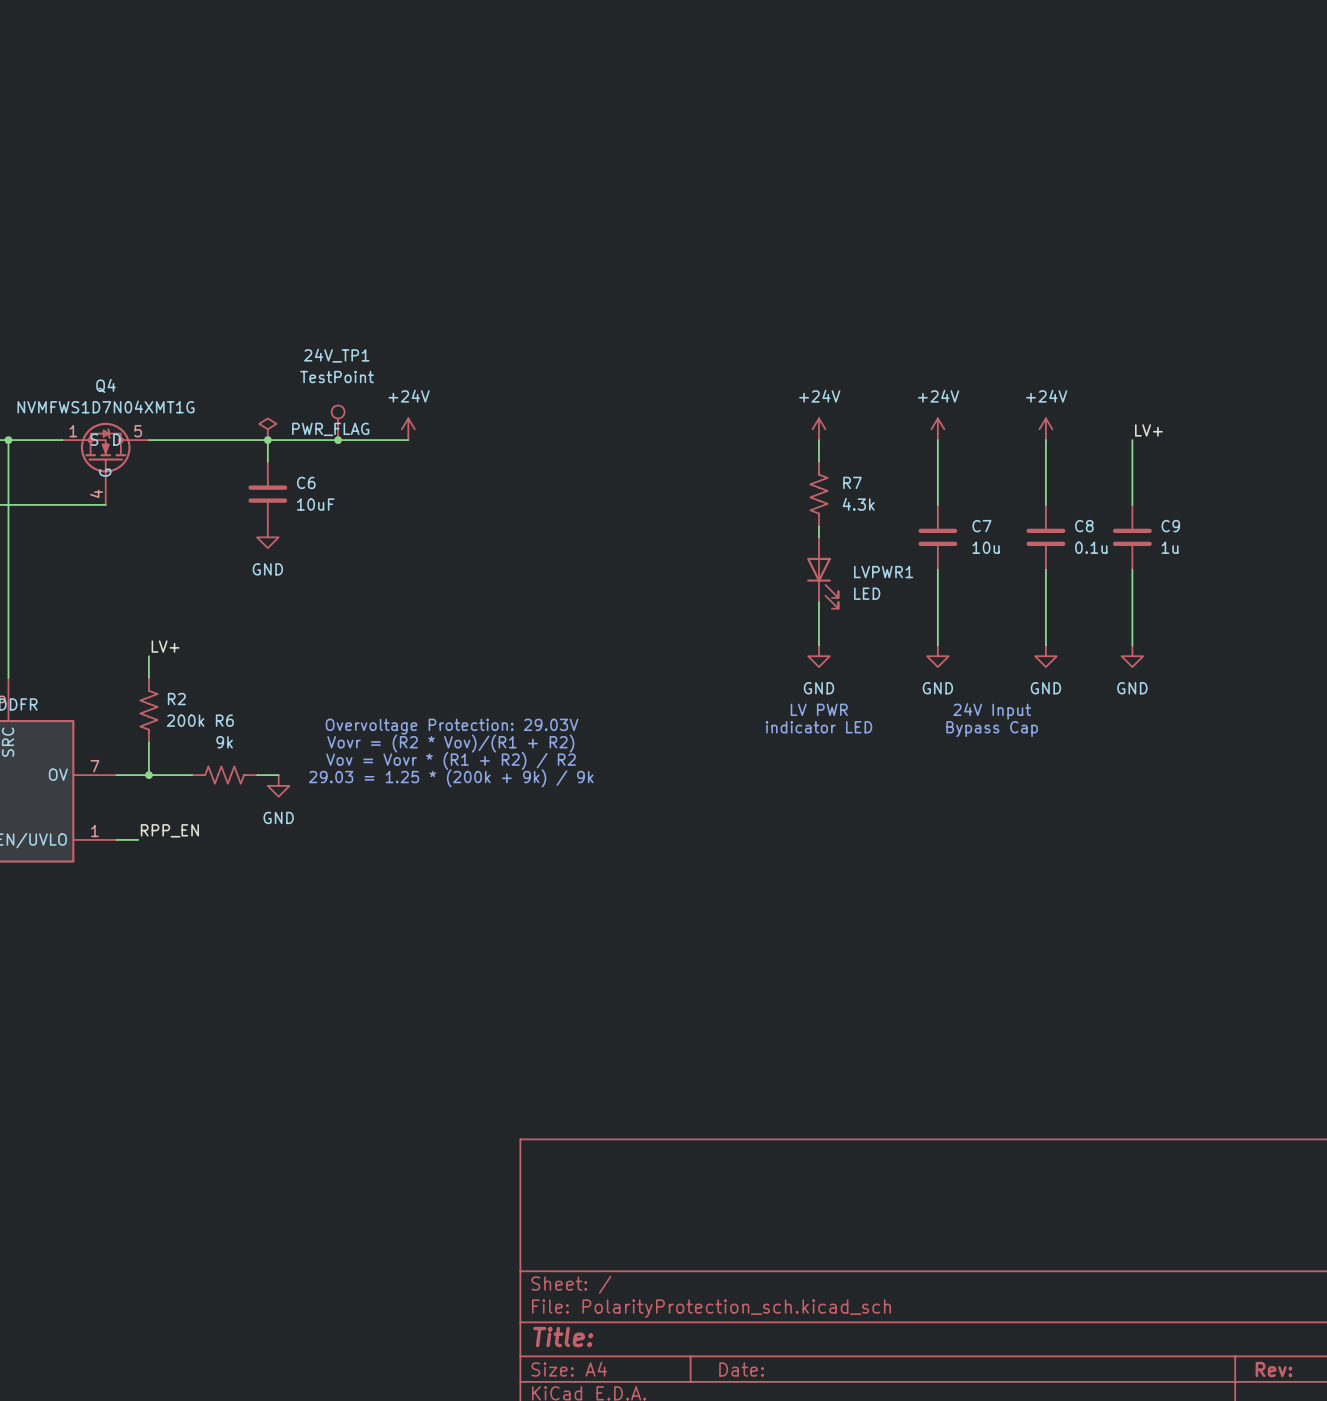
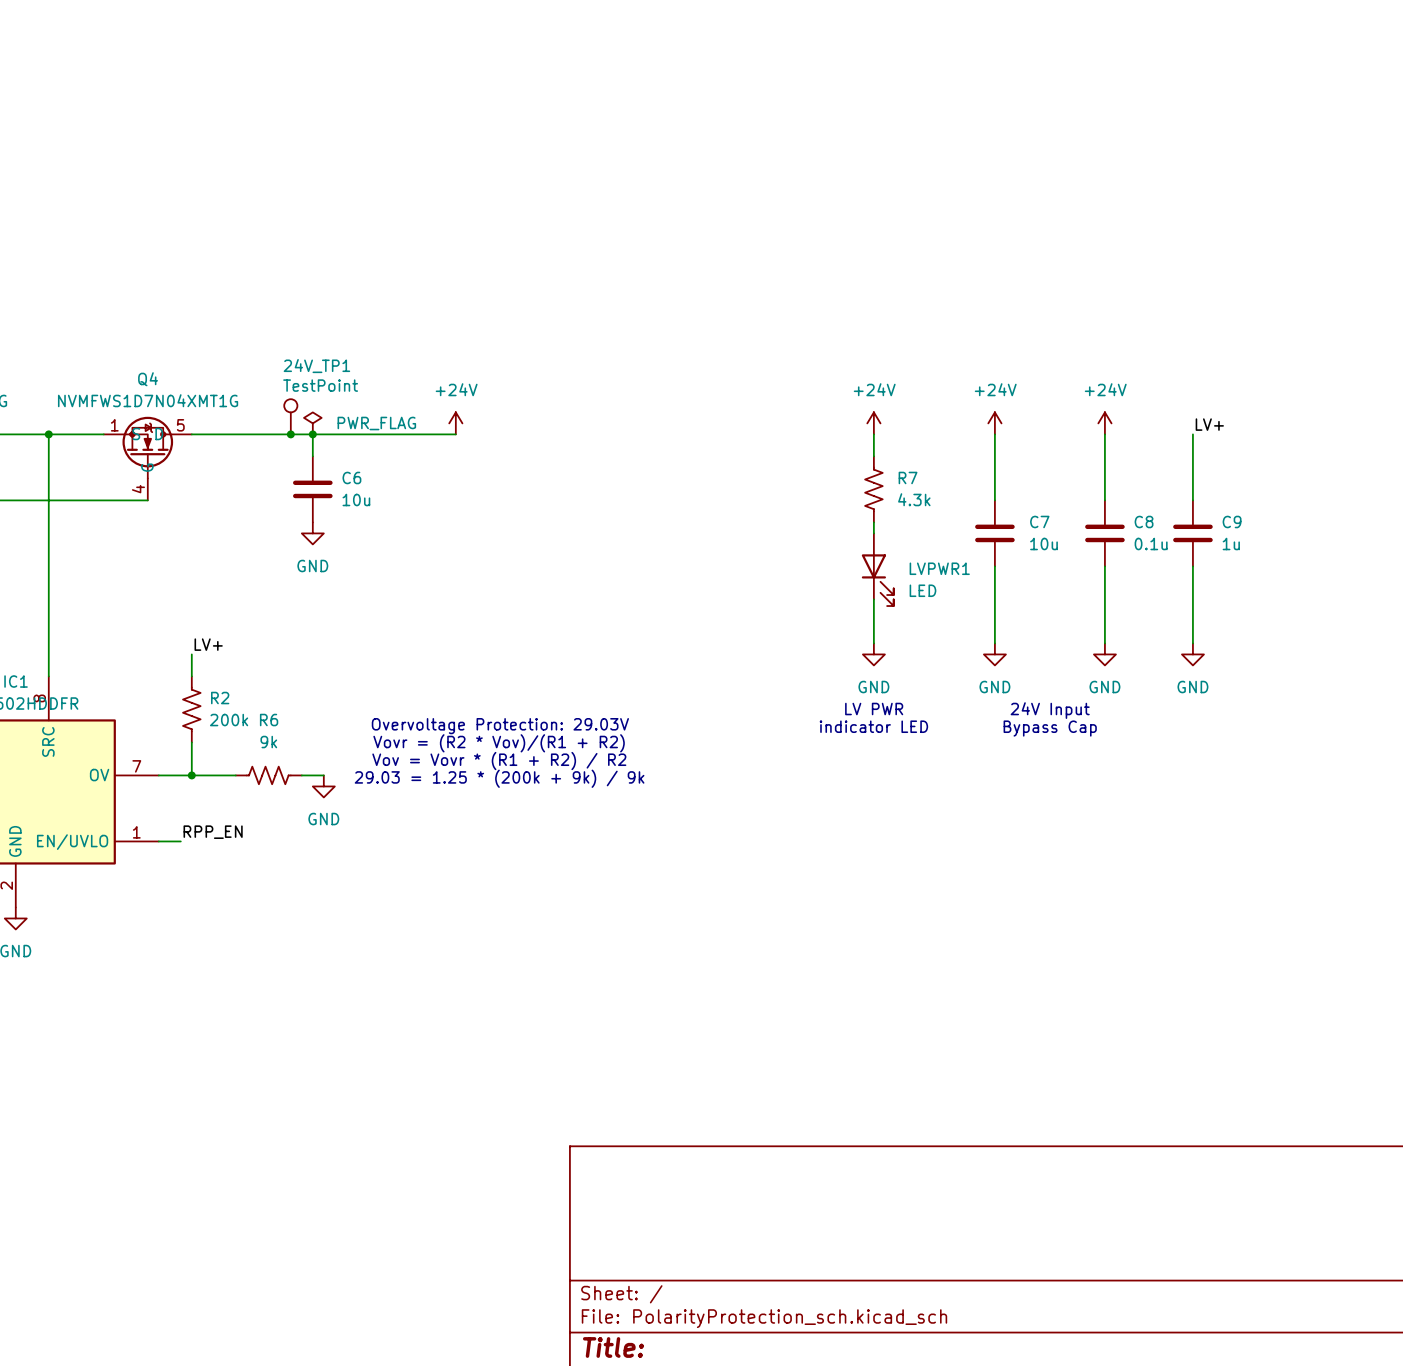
24V_TP1 name position: 24V_TP1 (336, 355) -> 24V_TP1 (316, 366)
24V_TP1 value position: TestPoint (337, 377) -> TestPoint (320, 385)
24V_TP1 position: (338, 422) -> (290, 416)
junction: none -> (290, 434)
junction: (338, 440) -> none
C6 value: 10uF (315, 504) -> 10u (356, 499)

